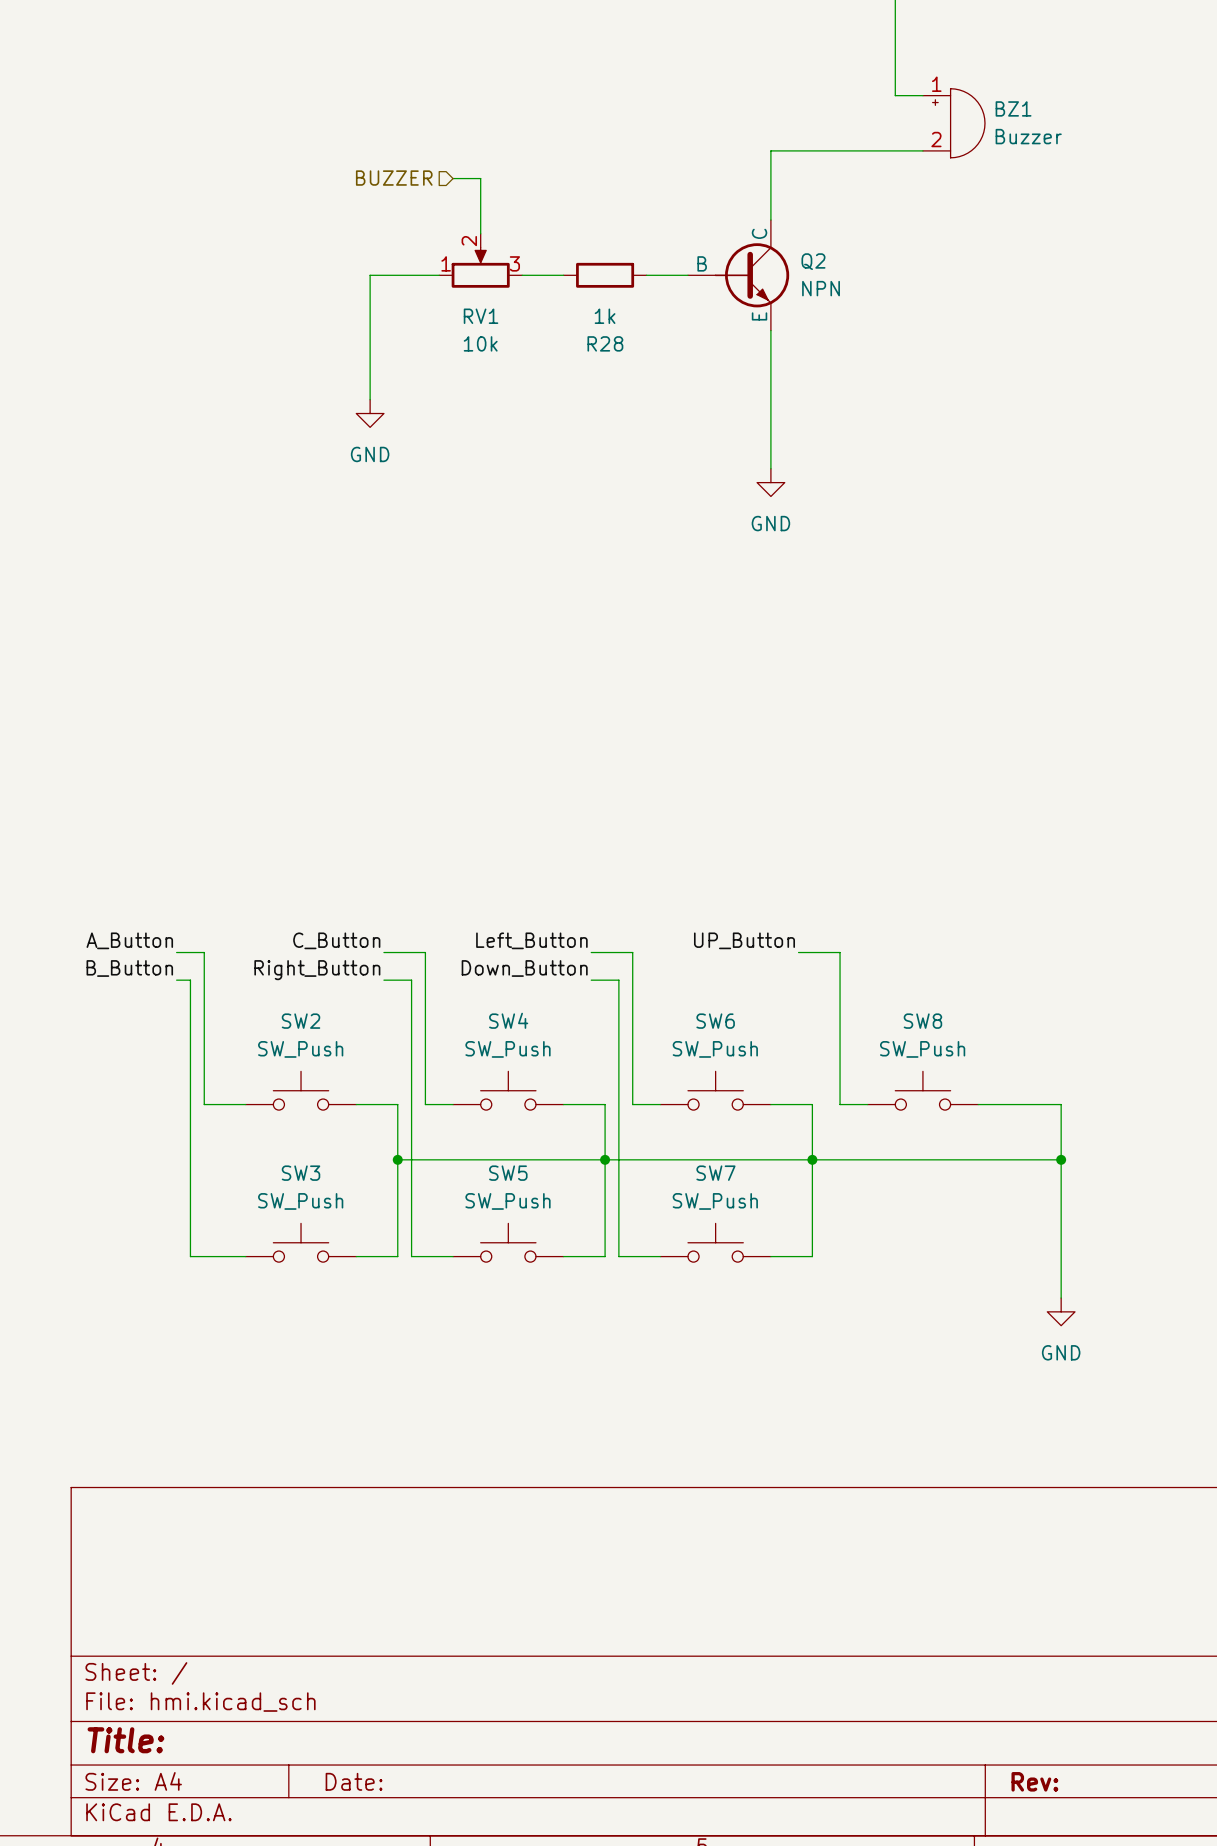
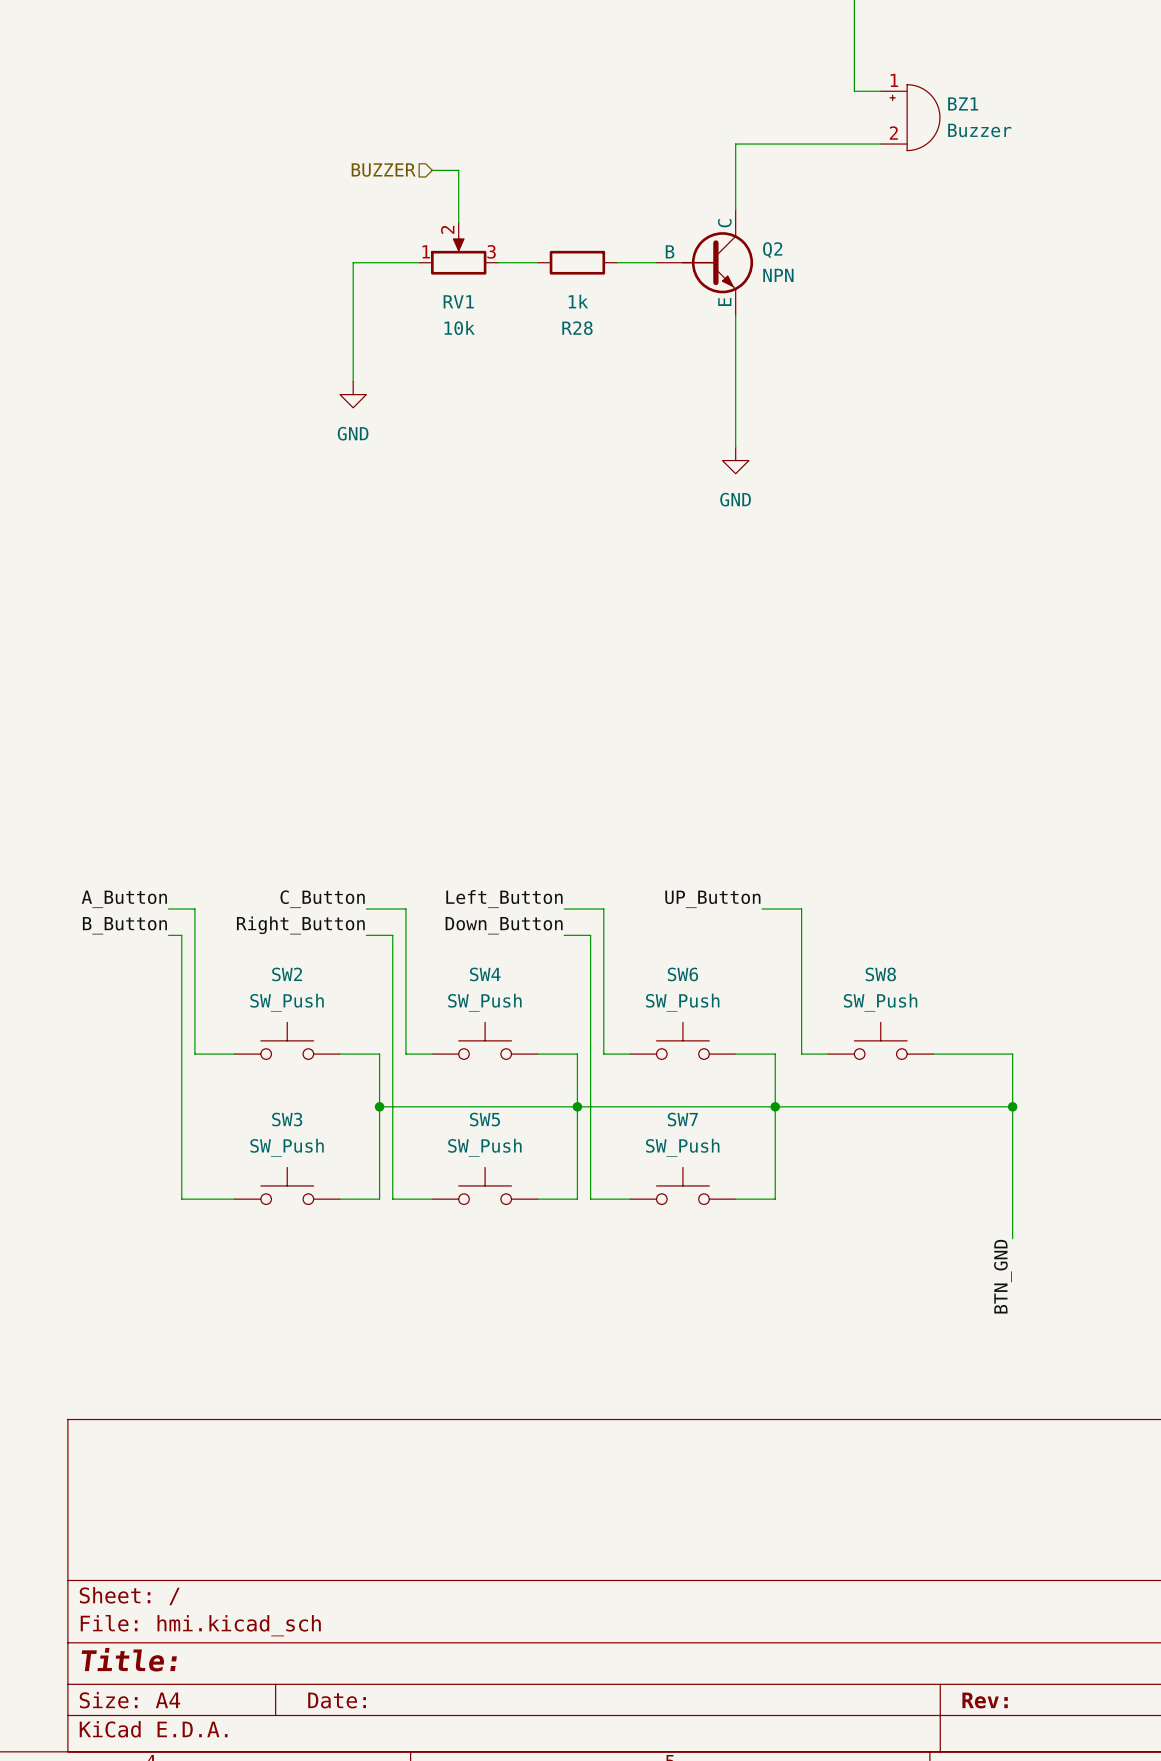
power symbol: GND (1061, 1311) -> none
label: none -> BTN_GND (1002, 1276)

